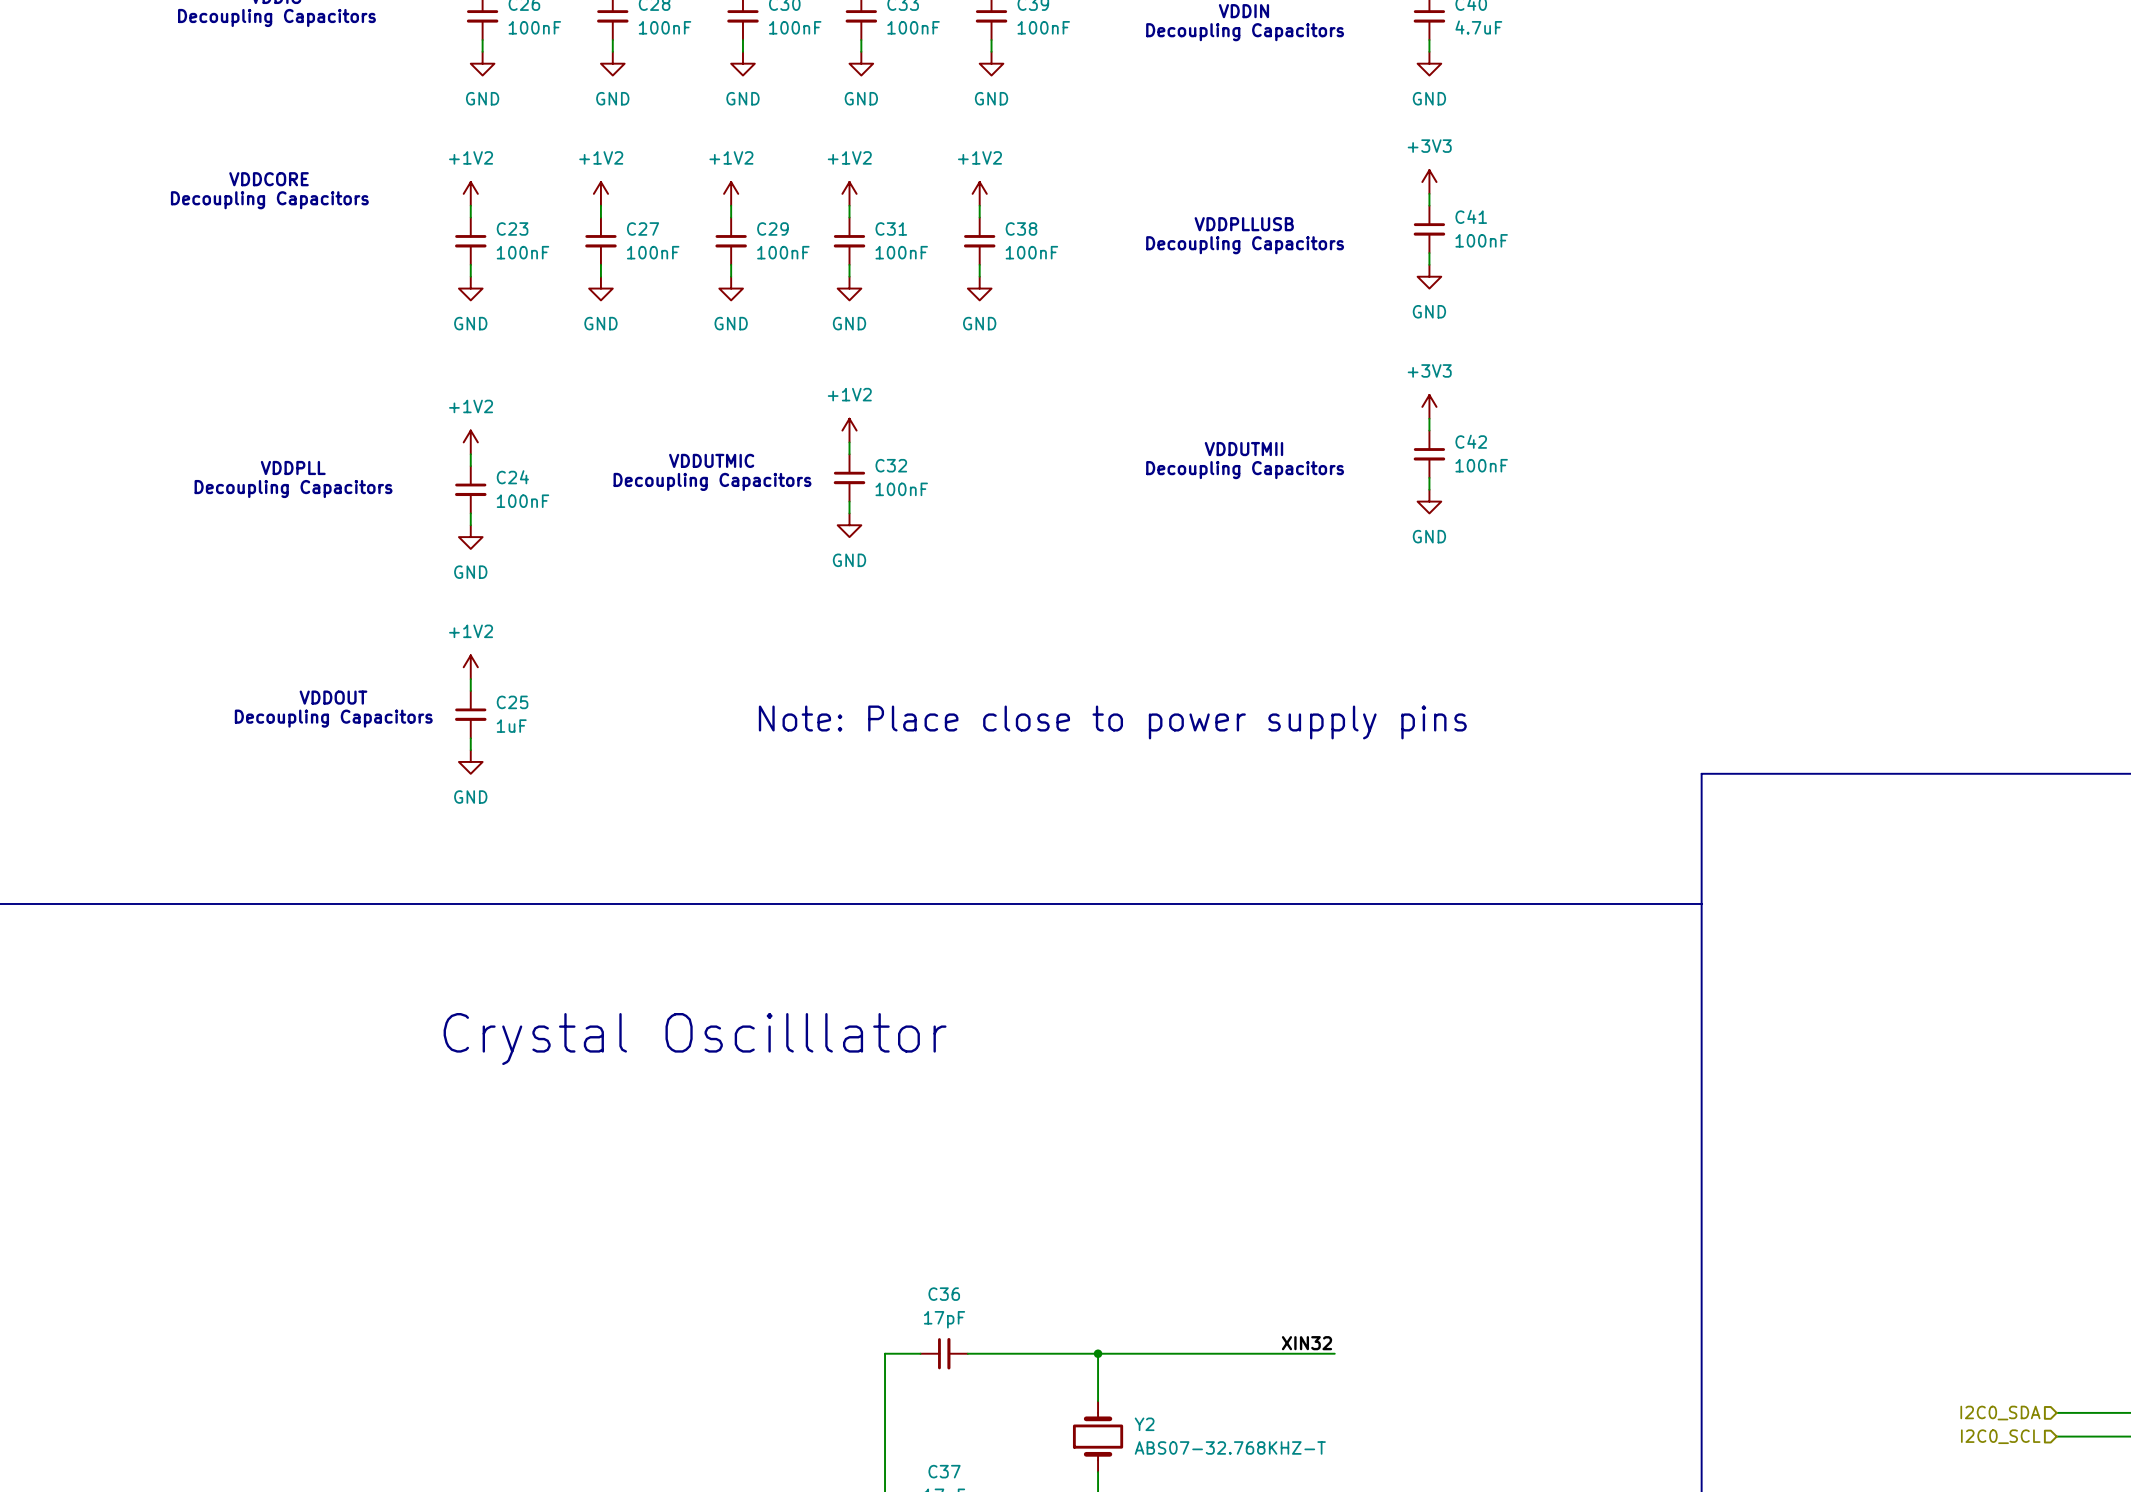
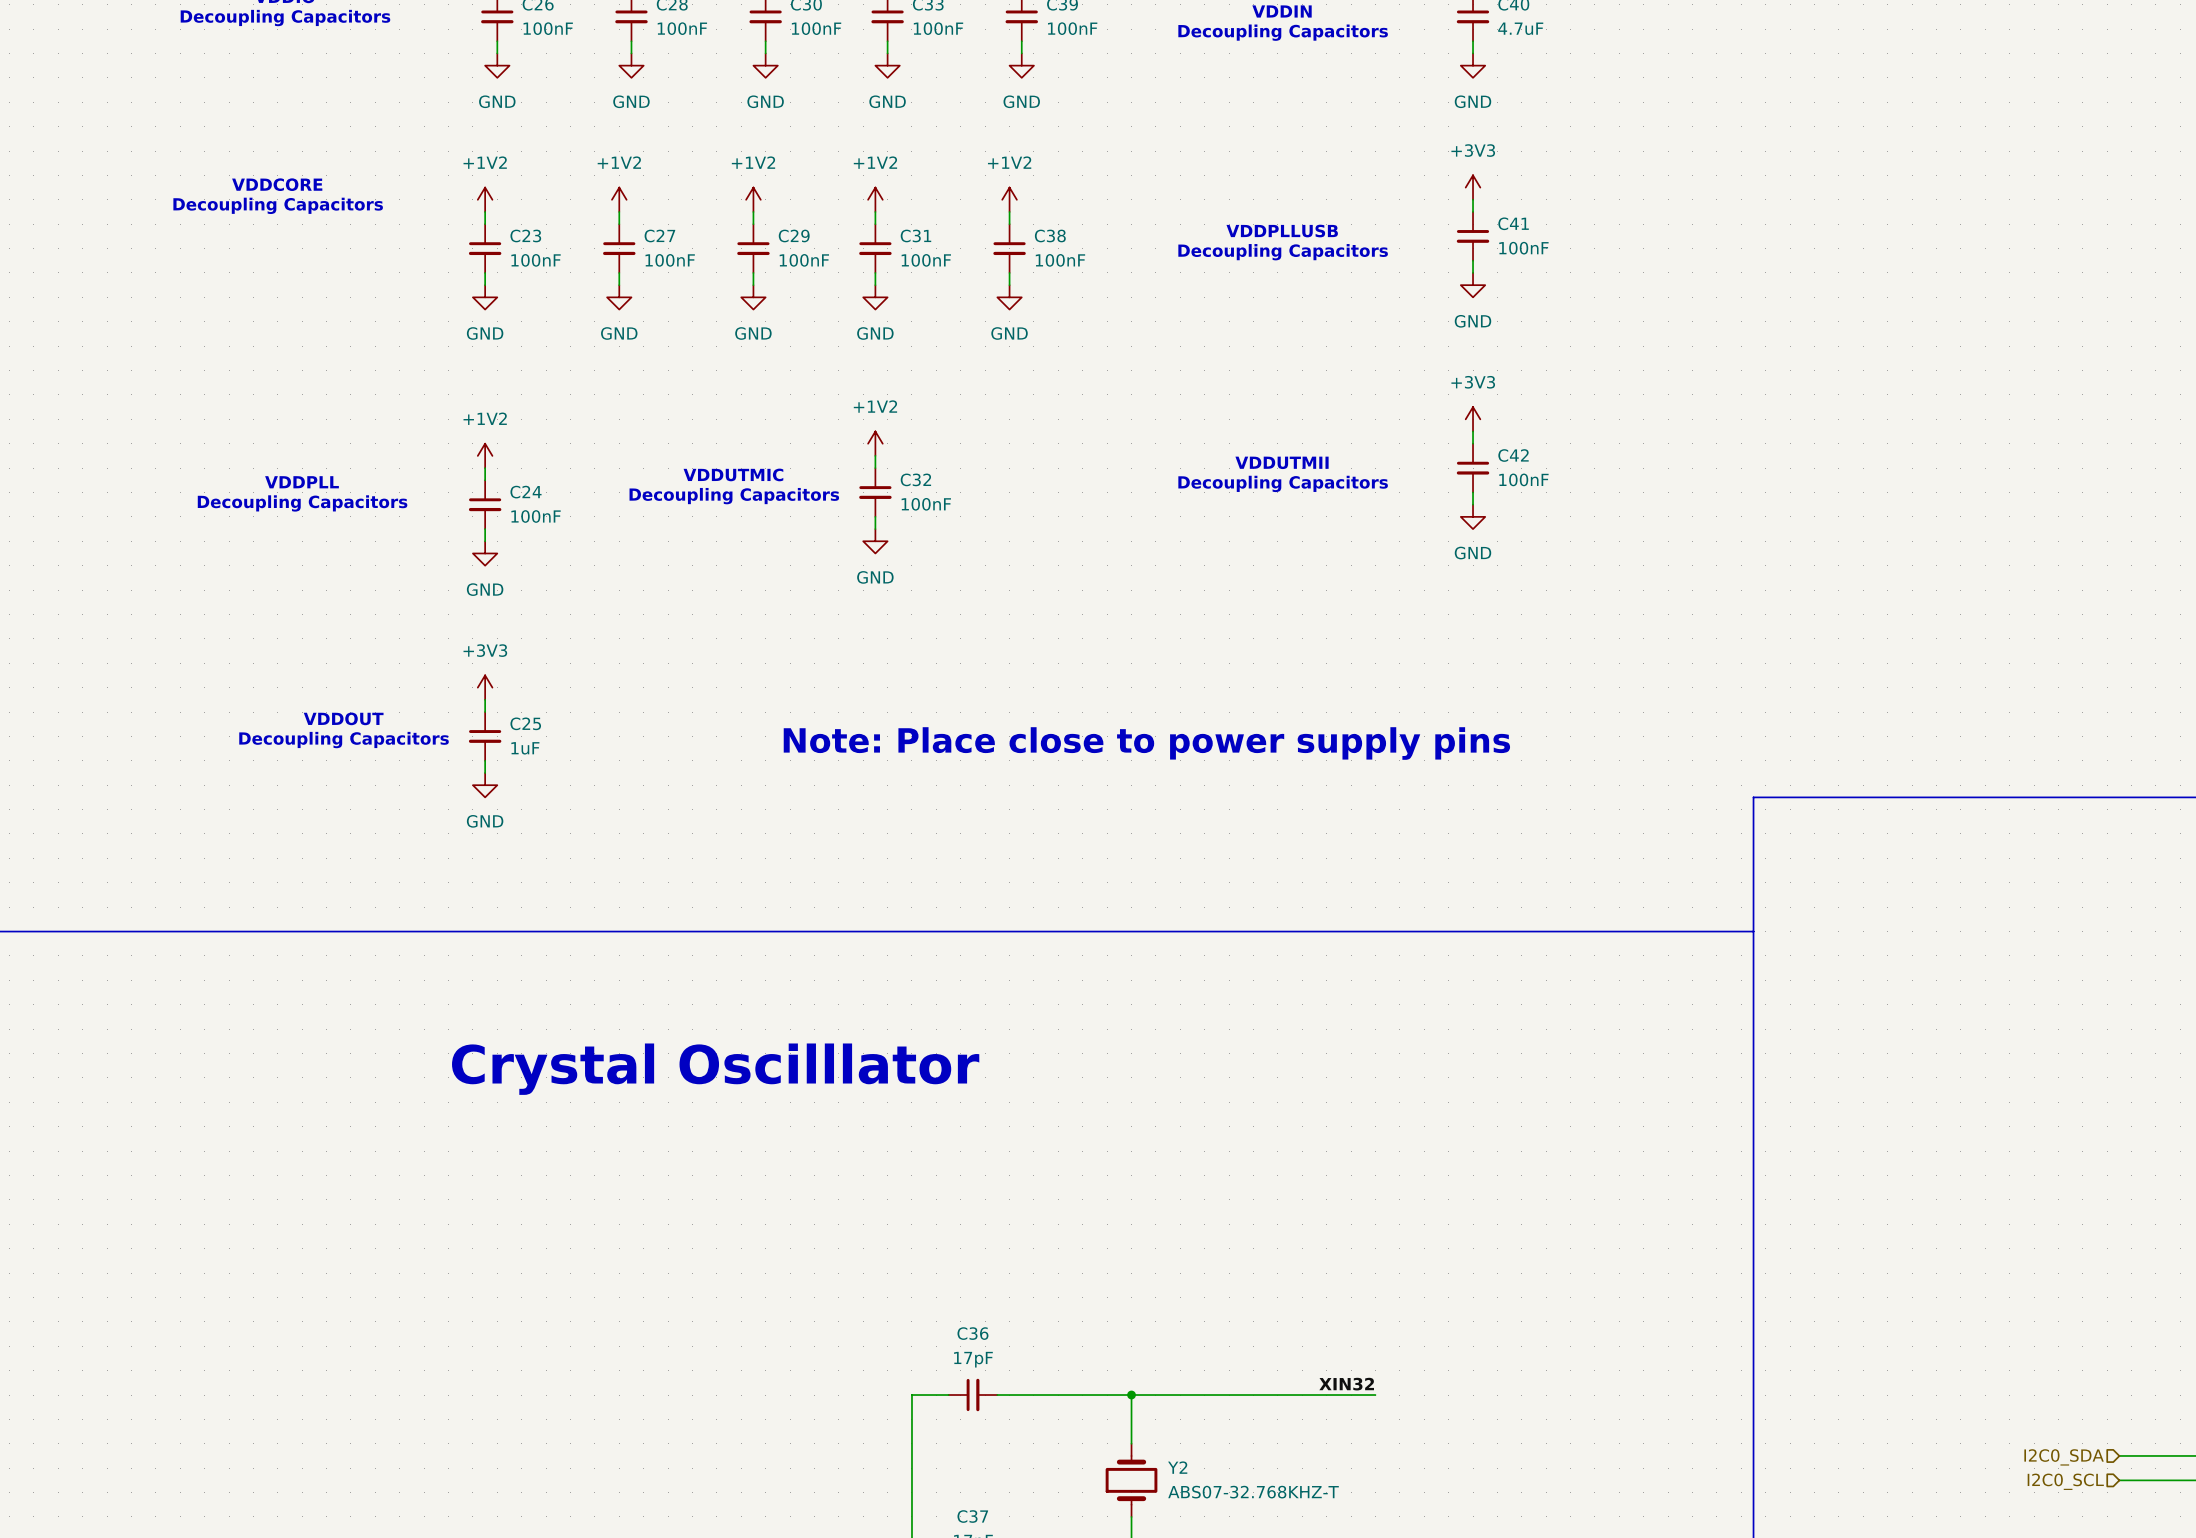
power symbol: +1V2 (470, 667) -> +3V3 (485, 687)

